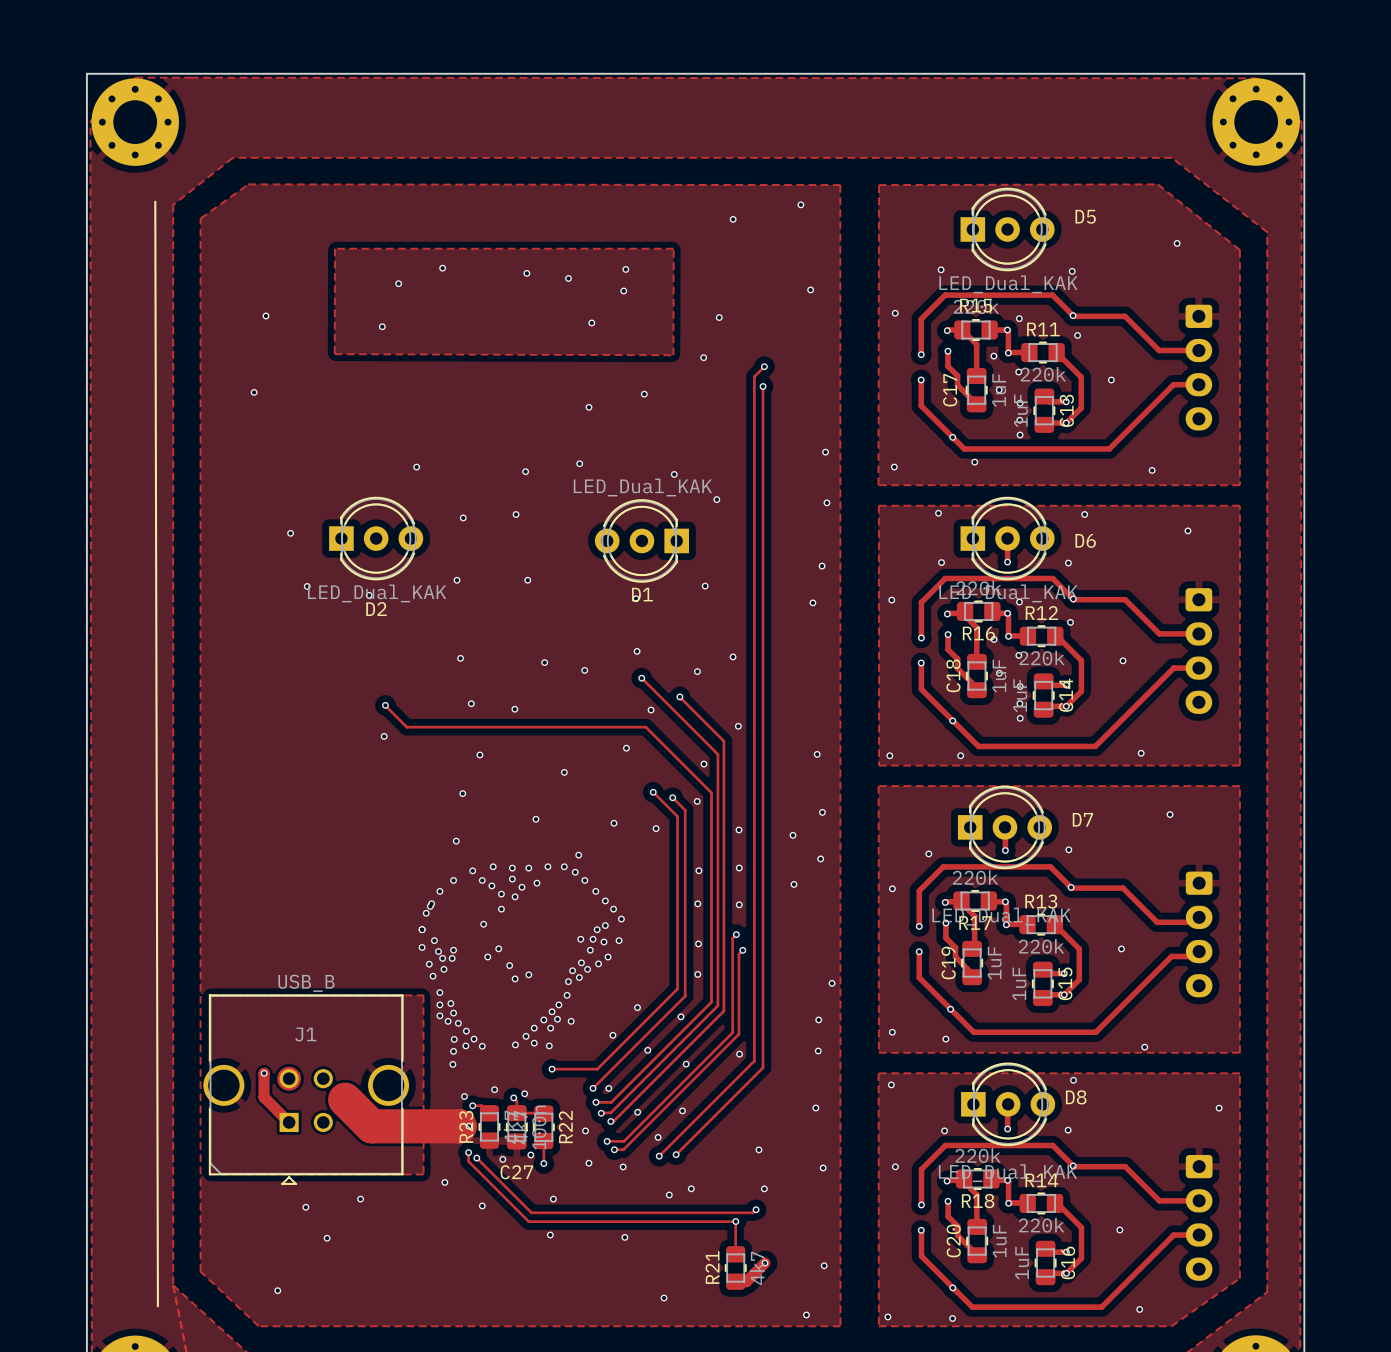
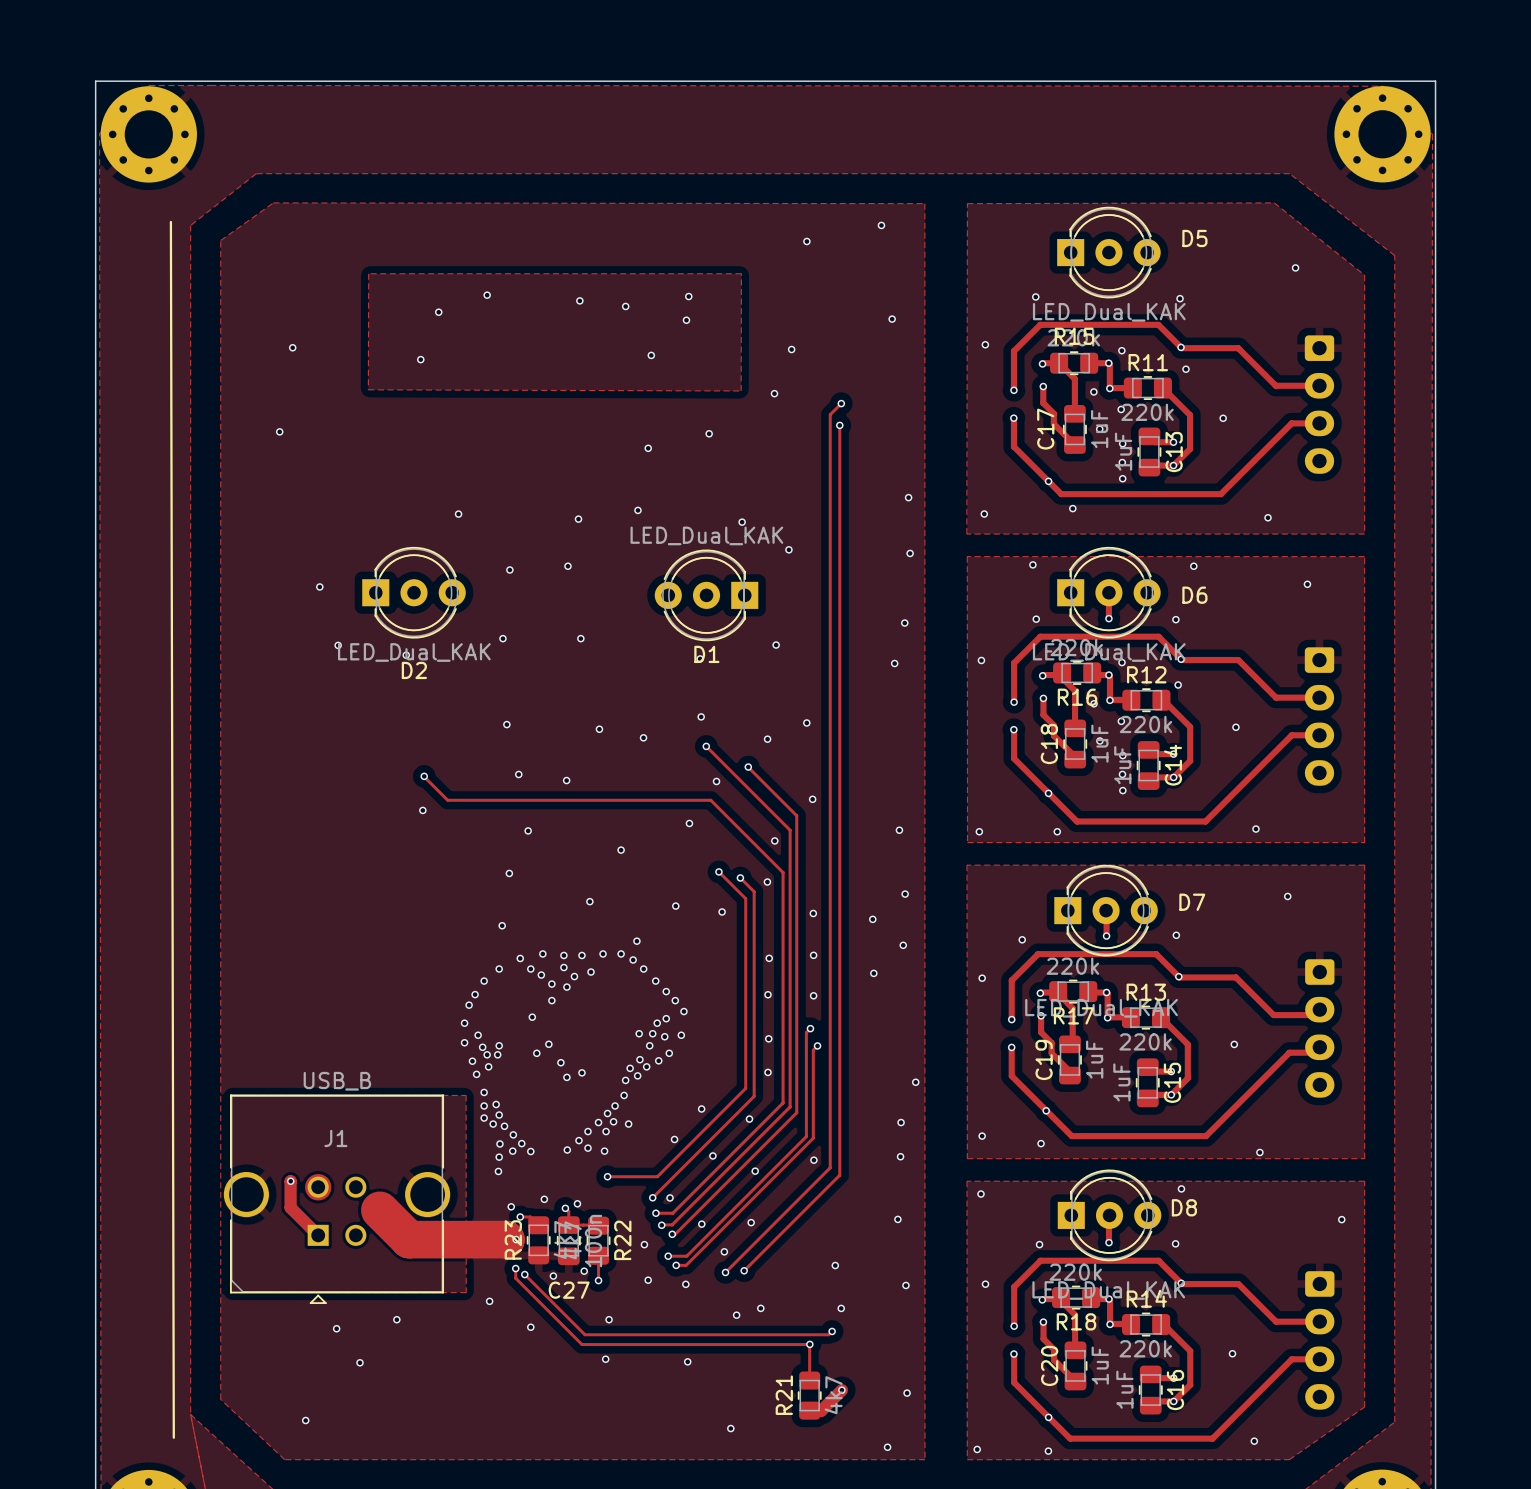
via: (430, 906) -> none

